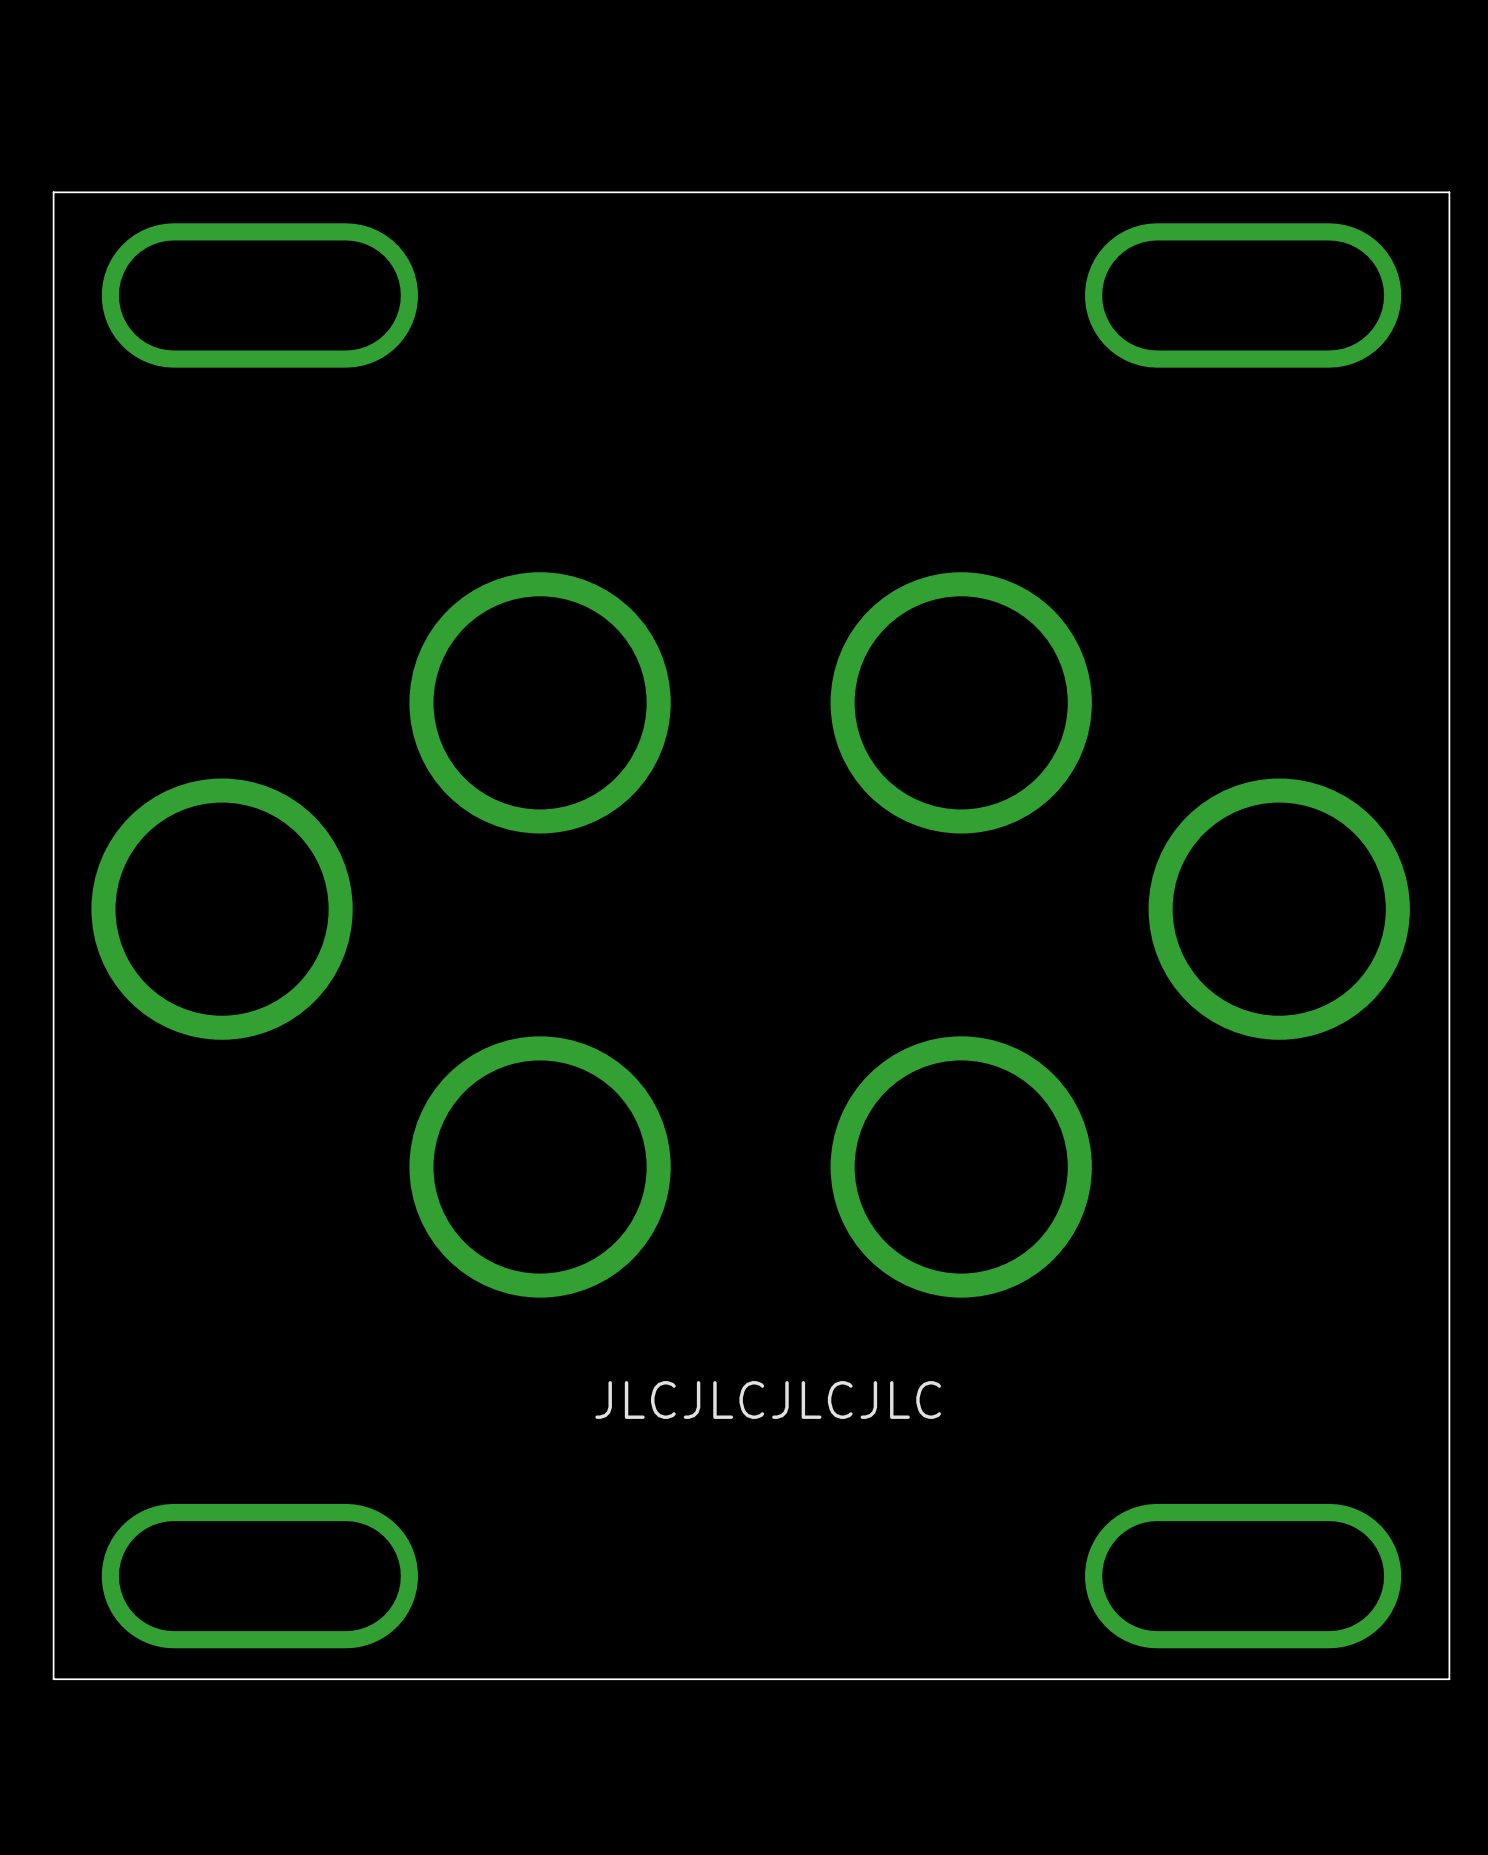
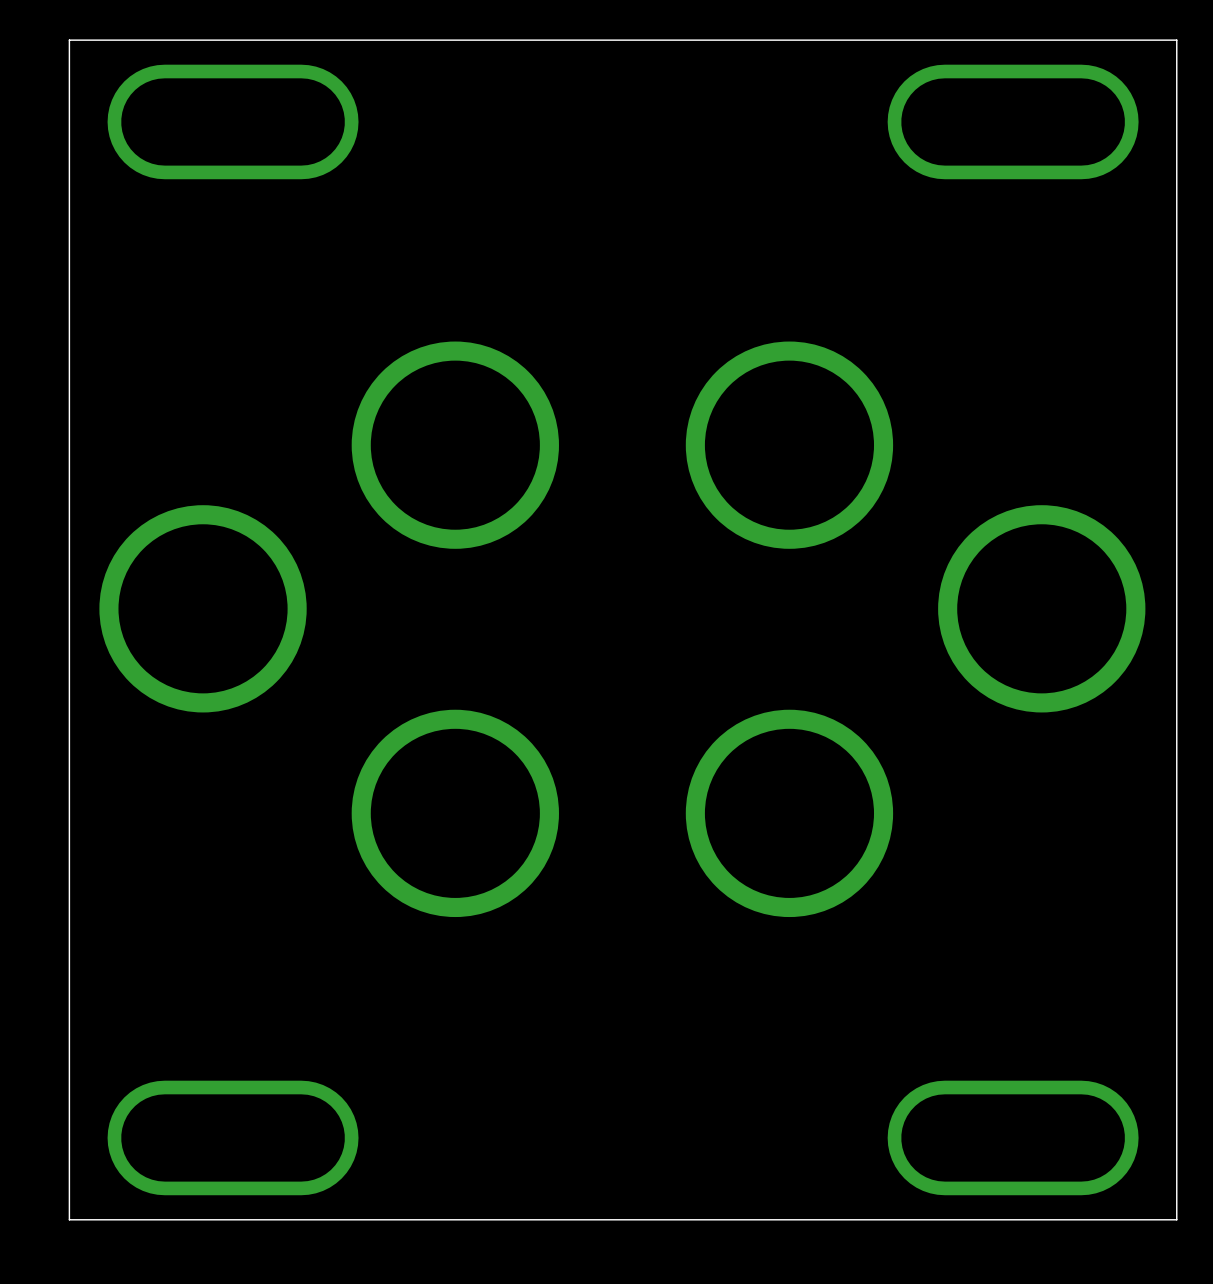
text: JLCJLCJLCJLC (768, 1400) -> none

